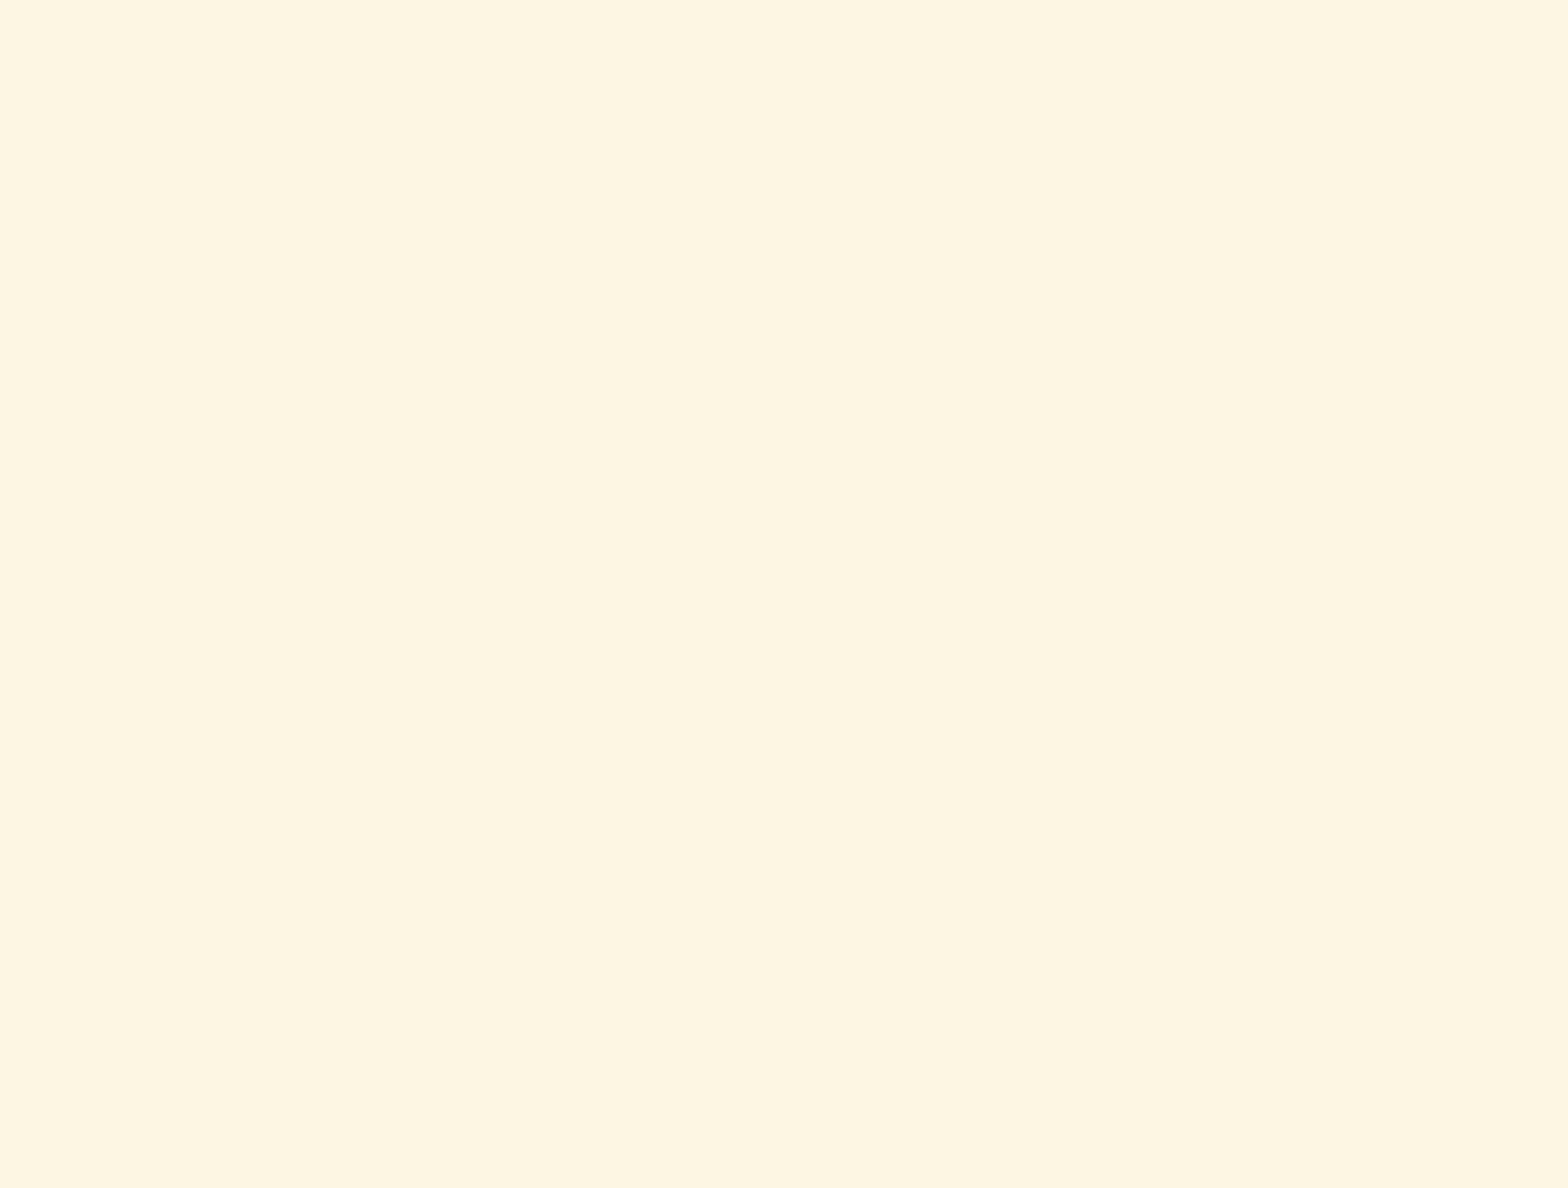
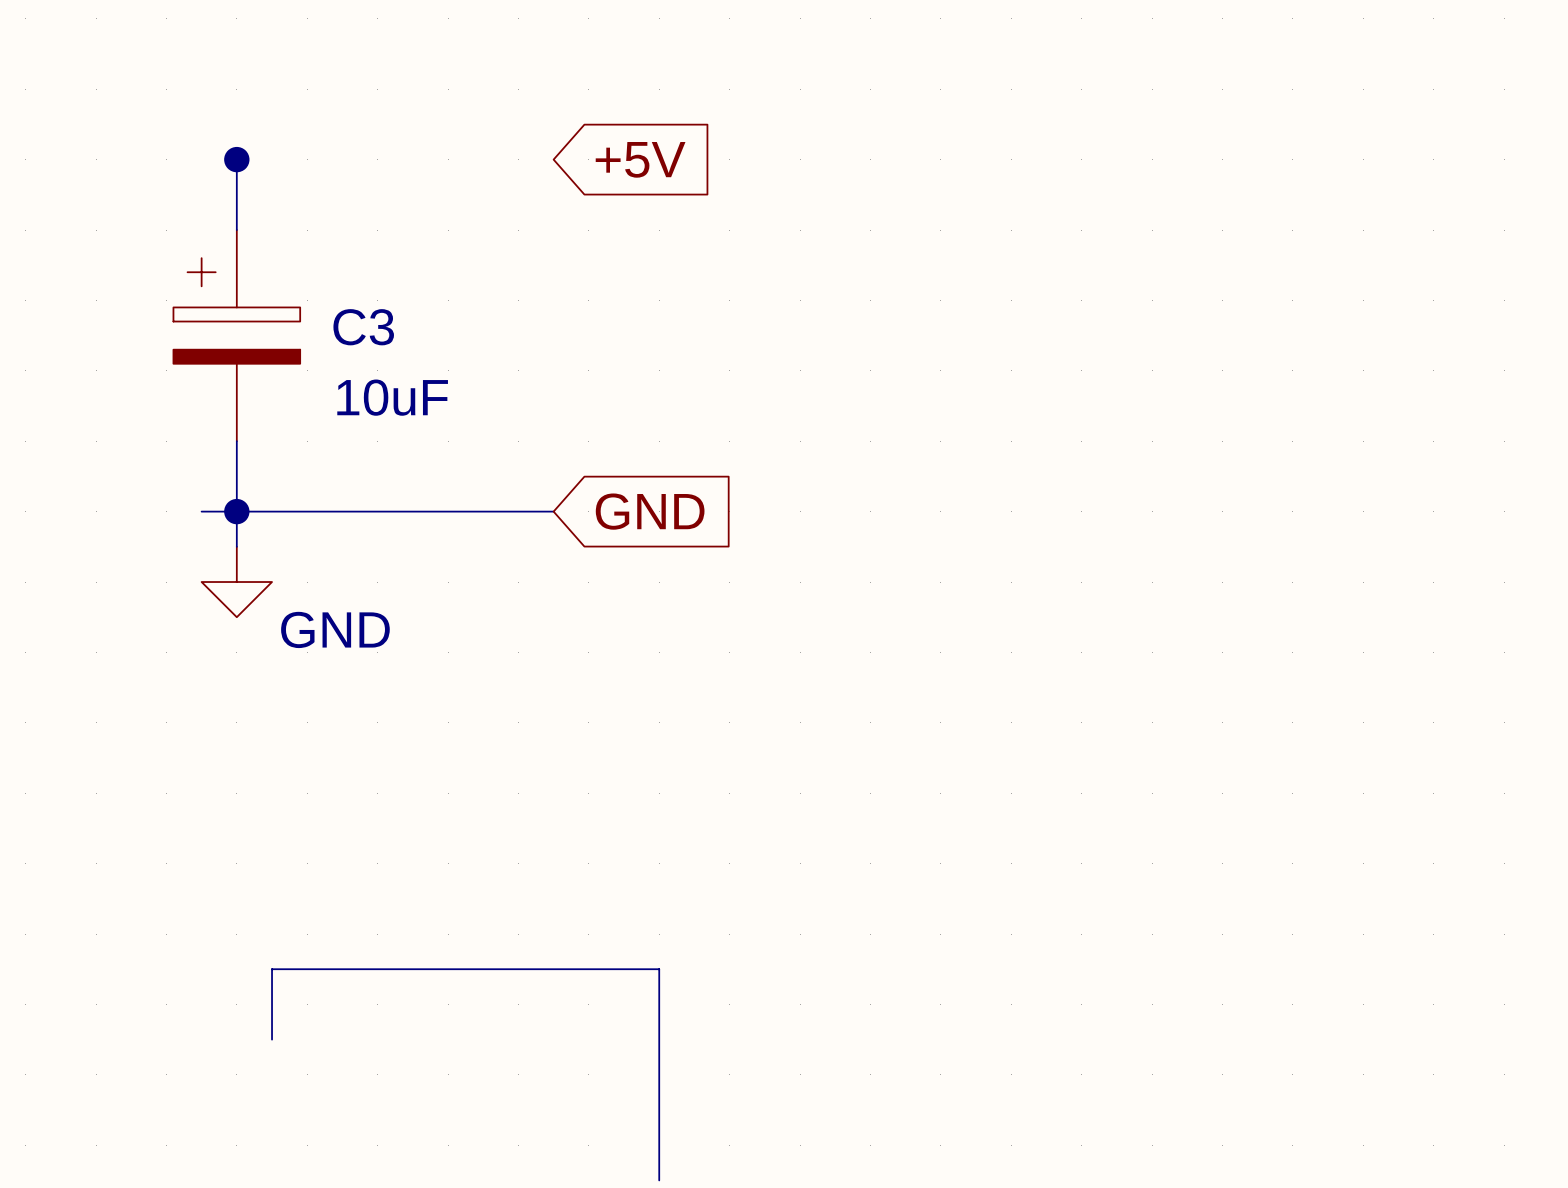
wire: none -> (236, 159) (236, 230)
junction: none -> (236, 159)
global label: none -> +5V (640, 159)
C3: none -> 10uF (236, 335)
wire: none -> (236, 441) (236, 546)
wire: none -> (201, 511) (553, 511)
junction: none -> (236, 511)
global label: none -> GND (650, 511)
power symbol: none -> GND (236, 582)
wire: none -> (272, 1039) (272, 969) (659, 969) (659, 1180)

